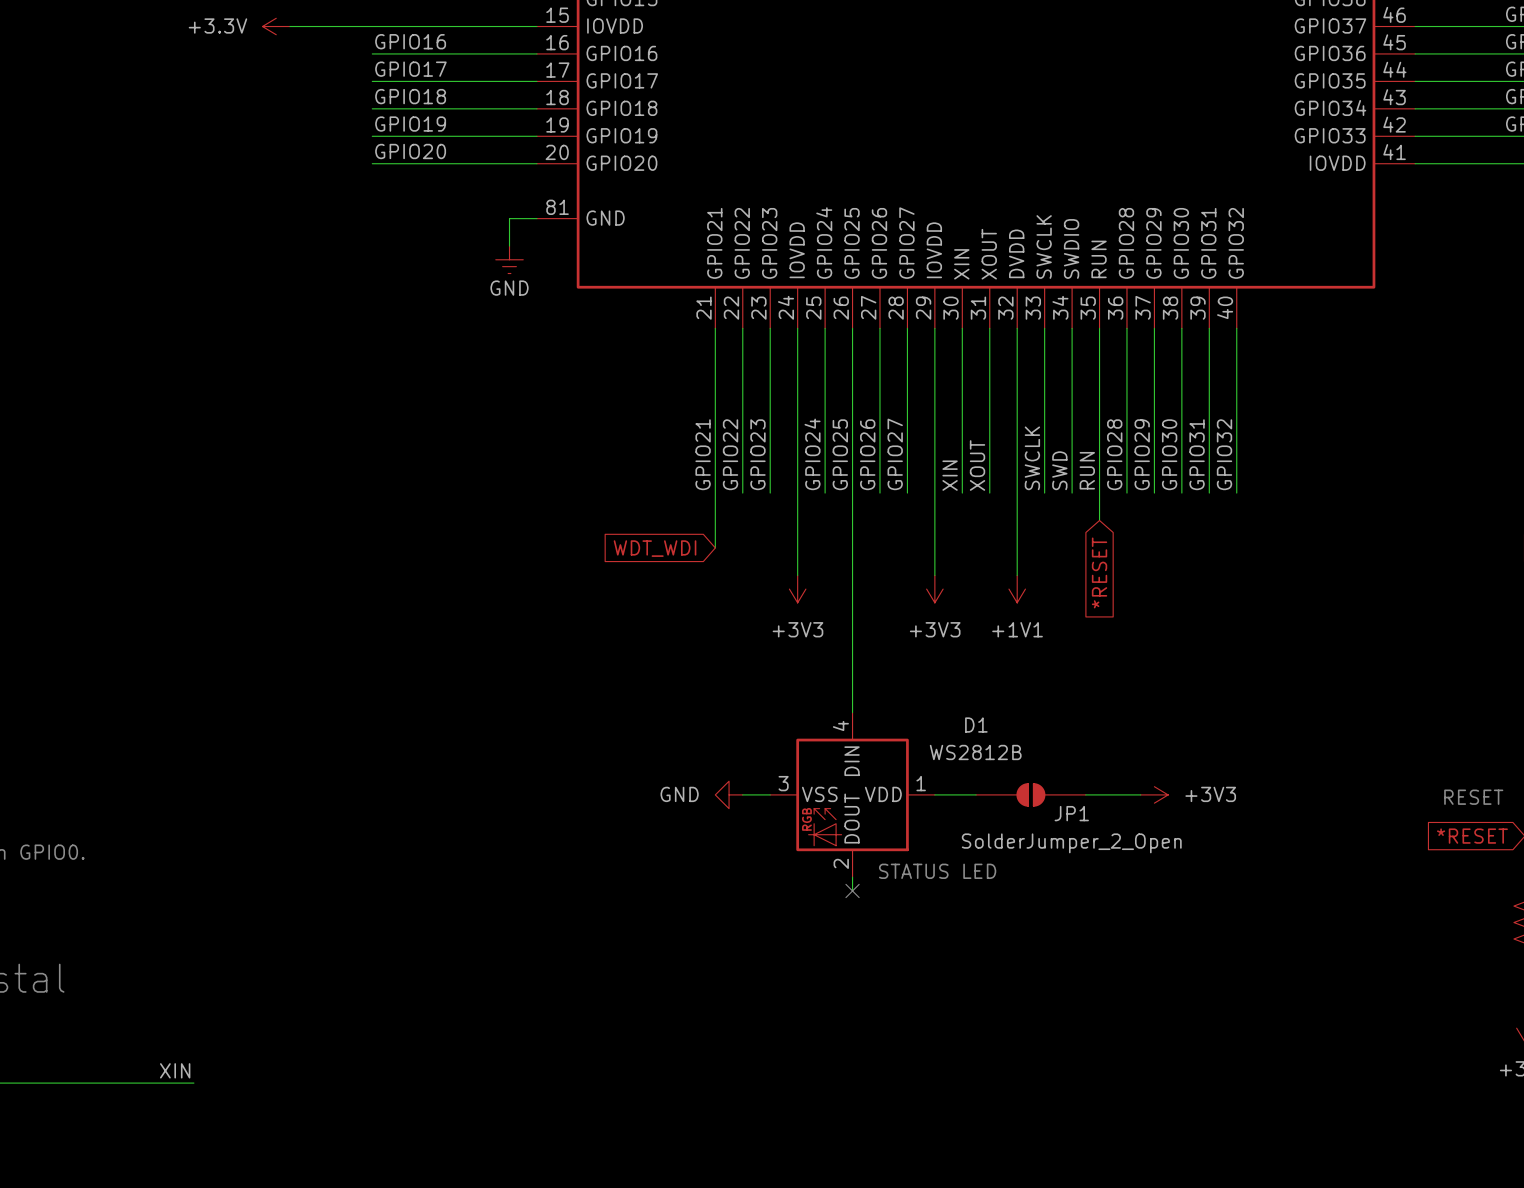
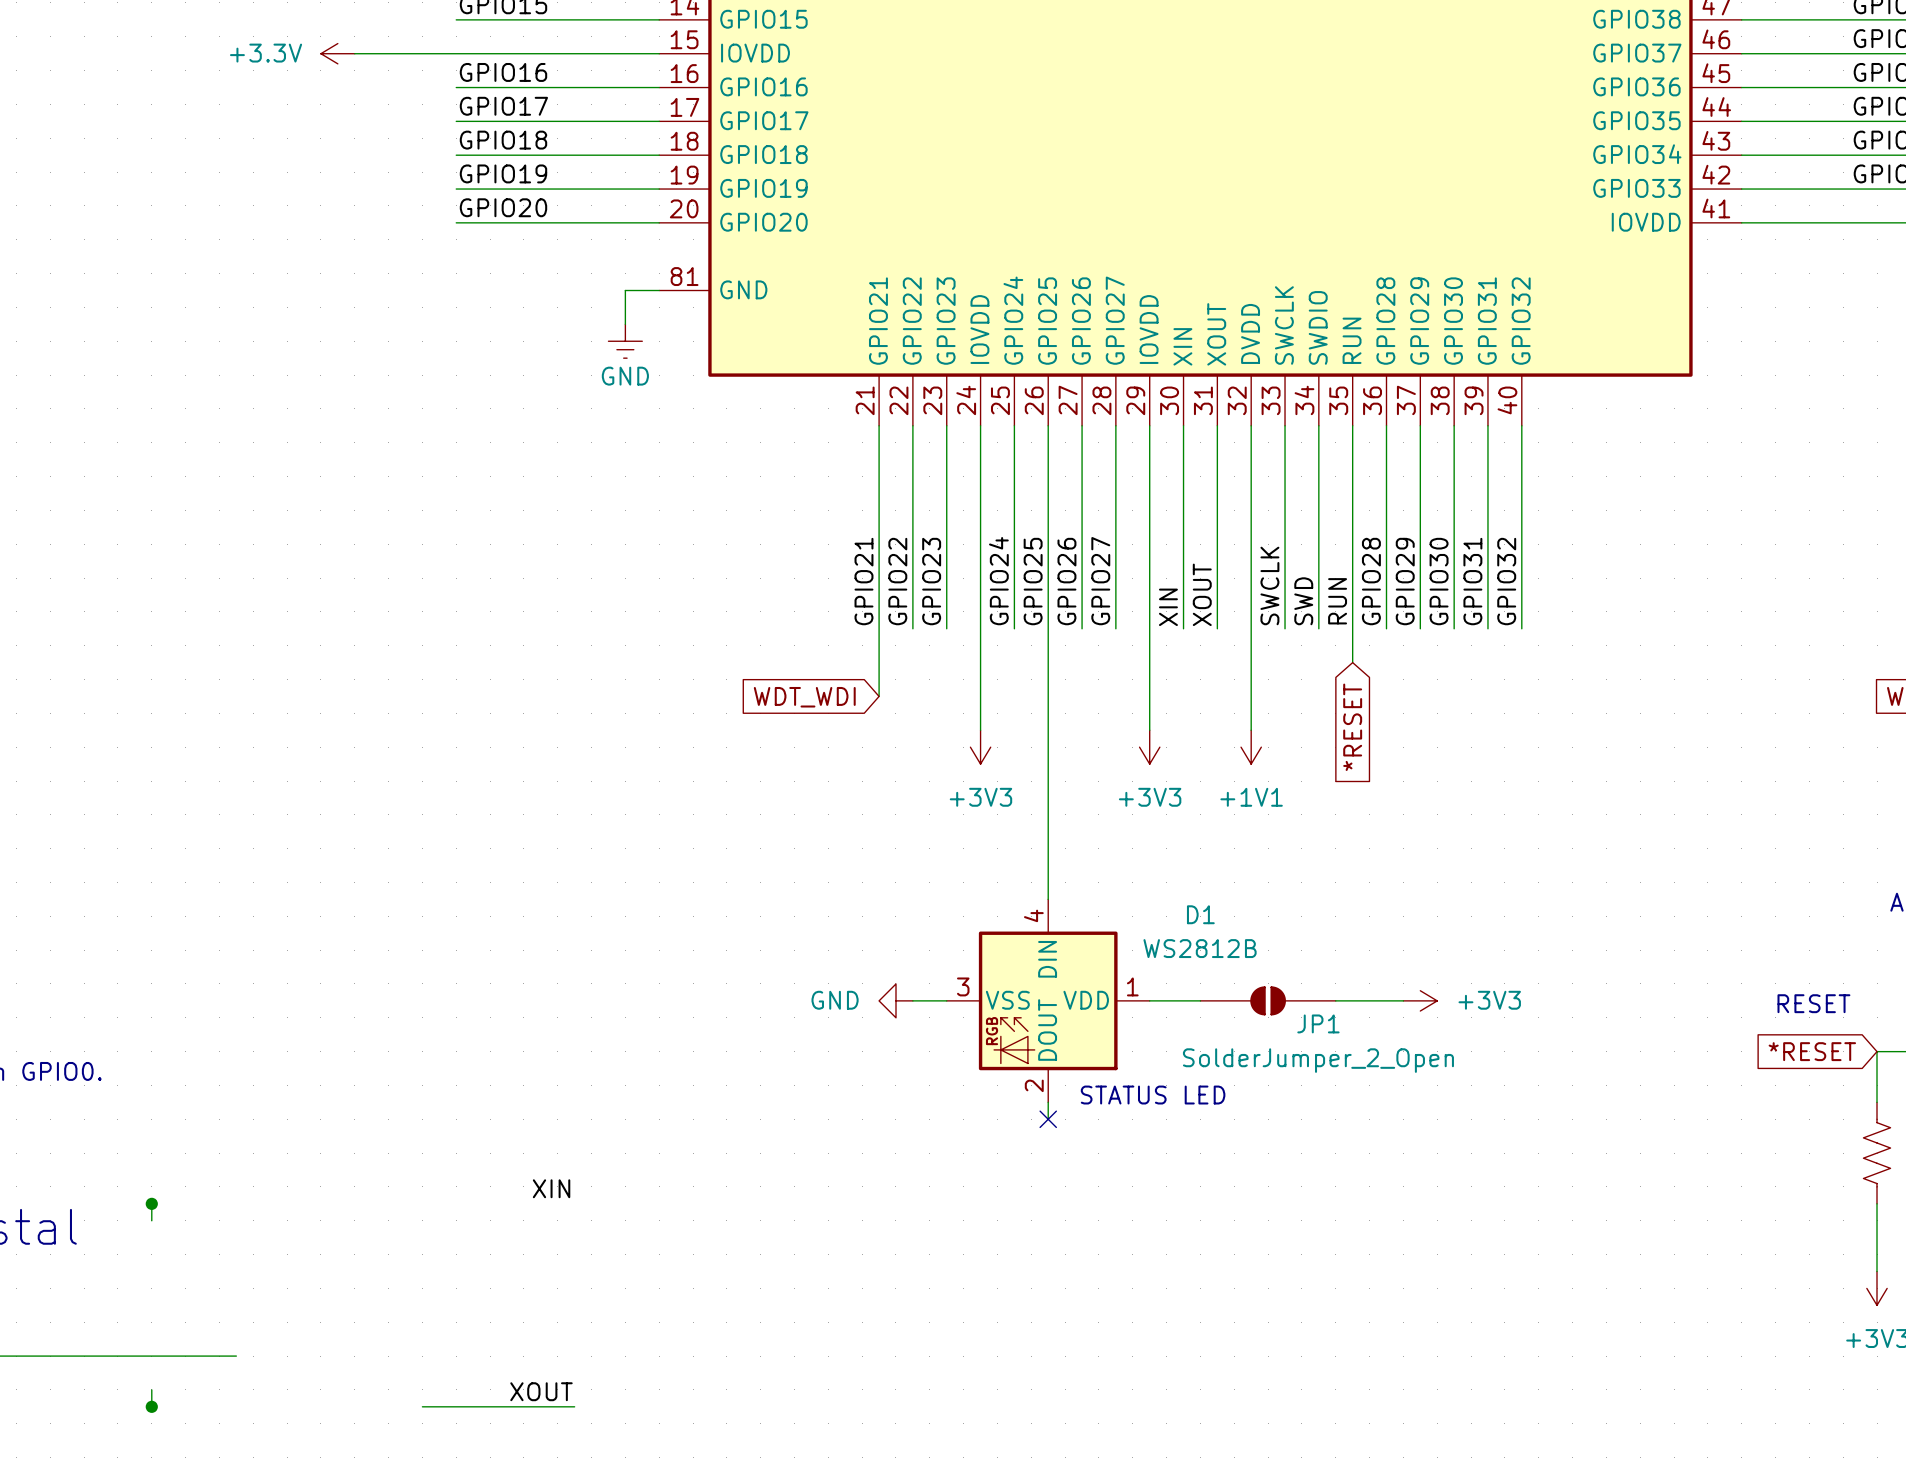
label: none -> XIN (551, 1188)
wire: none -> (151, 1203) (151, 1220)
junction: none -> (151, 1203)
label: XIN (175, 1070) -> none
wire: none -> (151, 1389) (151, 1406)
label: none -> XOUT (541, 1391)
junction: none -> (151, 1406)
wire: none -> (422, 1406) (574, 1406)

